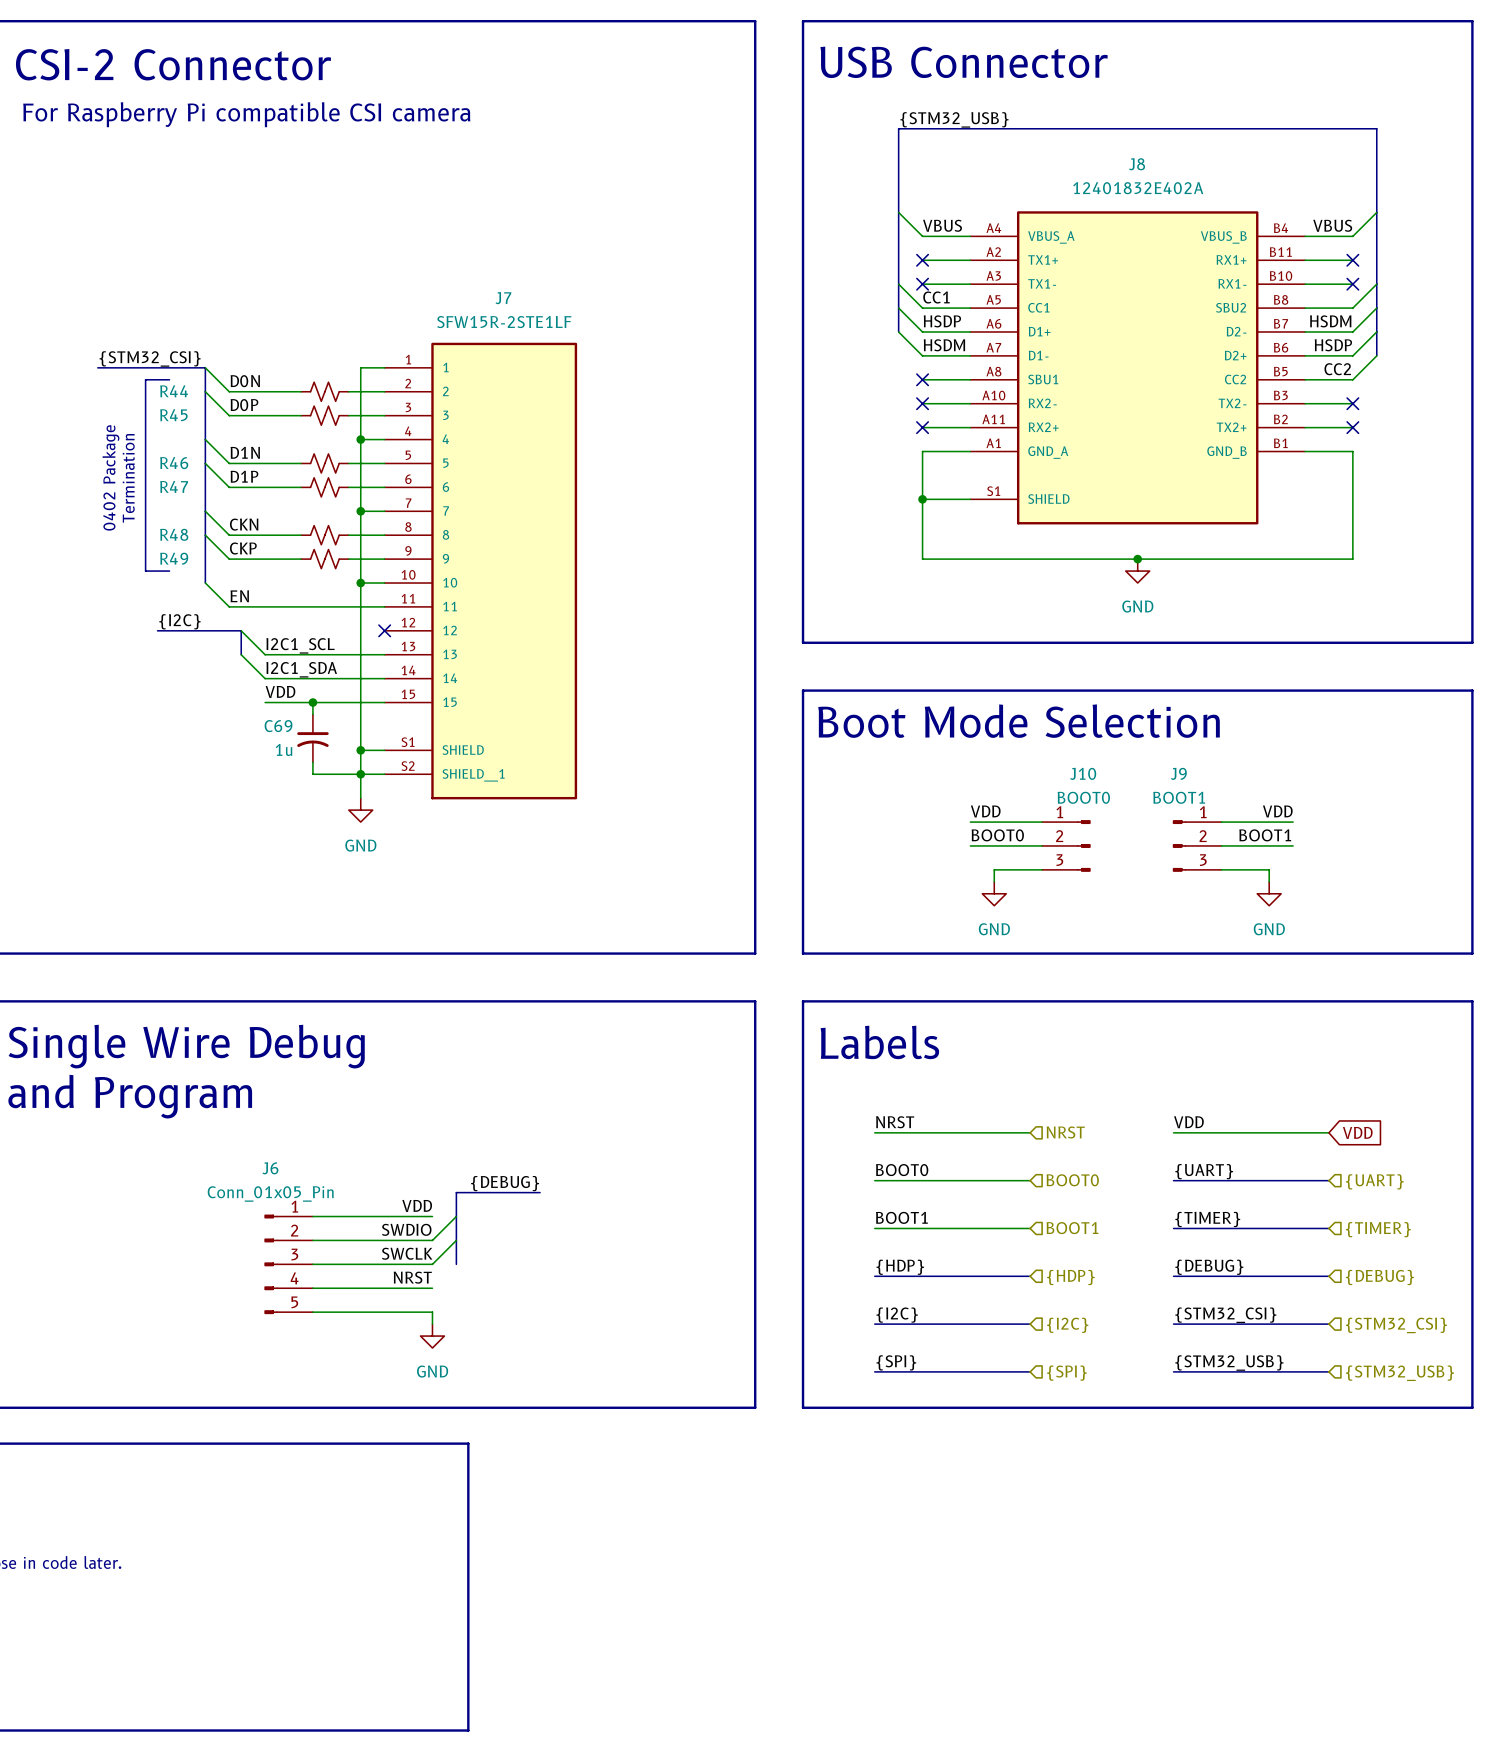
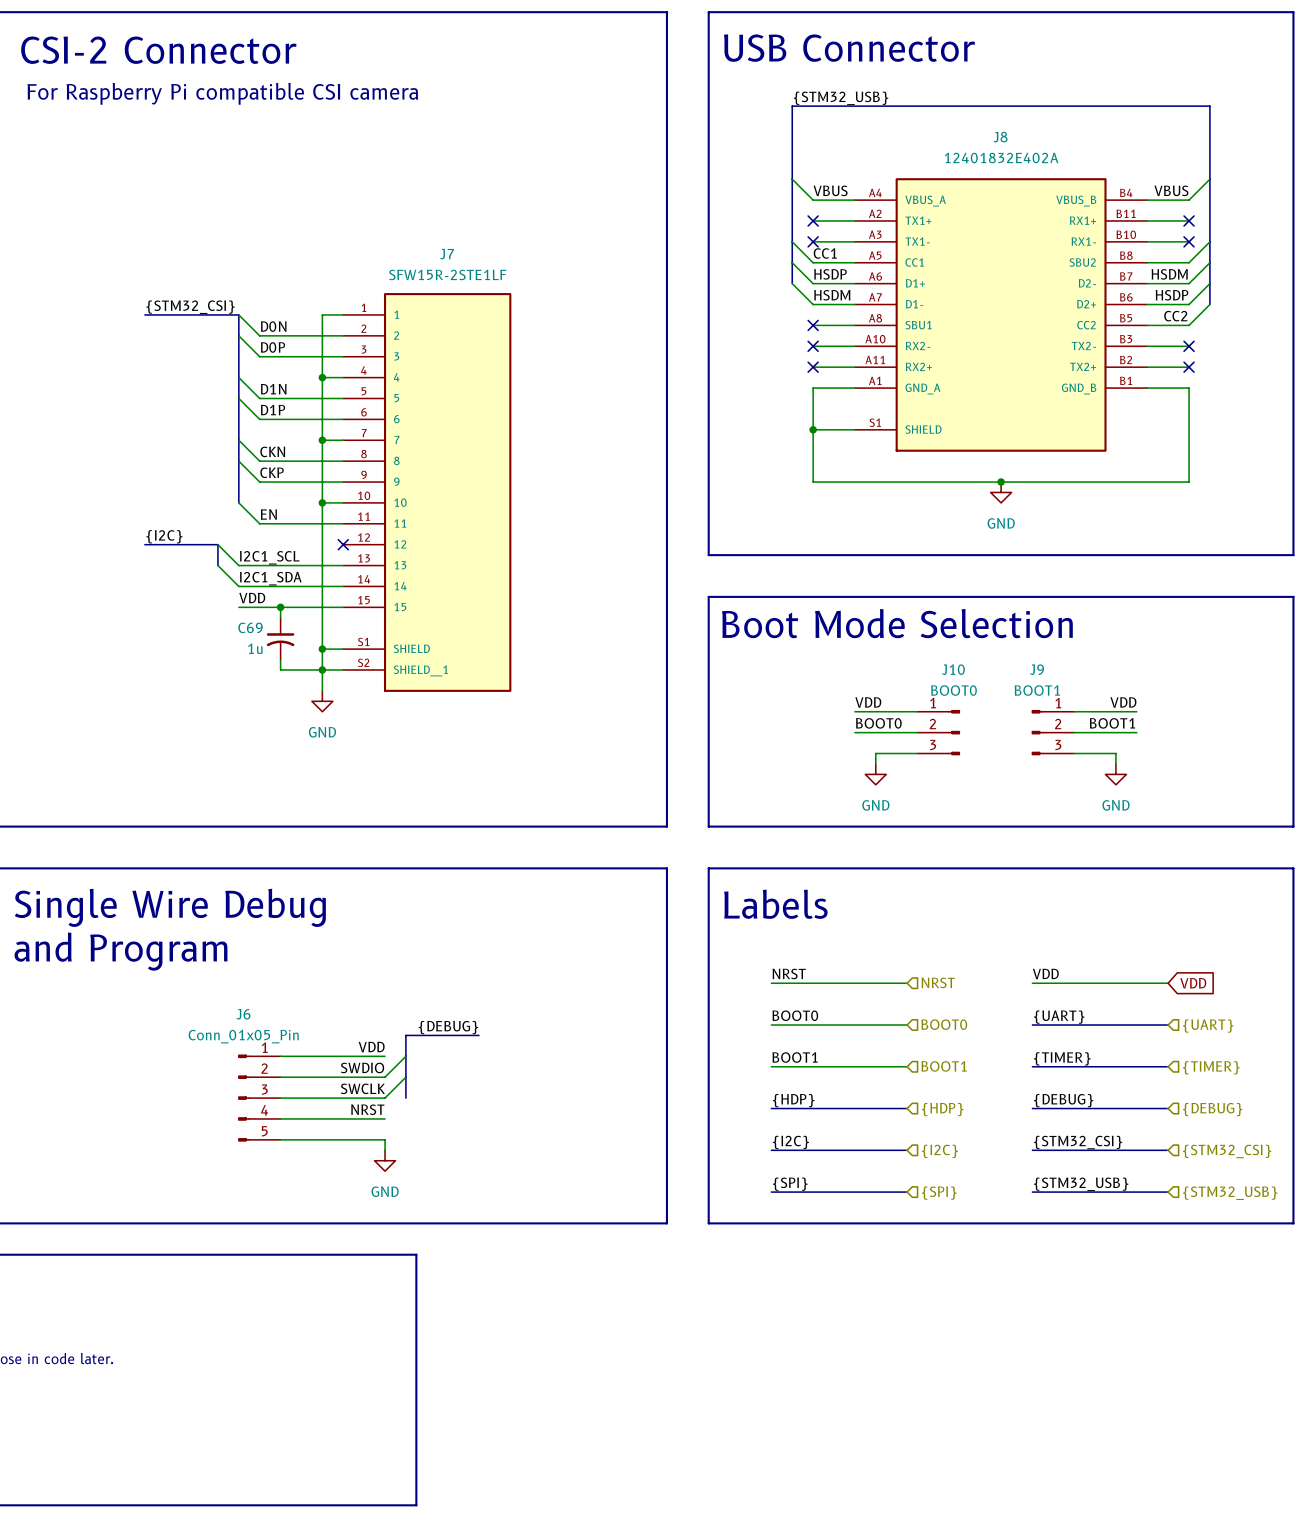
label position: {STM32_CSI} (150, 358) -> {STM32_CSI} (190, 307)
bus: (97, 367) (157, 367) -> none
wire: (205, 367) (229, 391) (289, 391) -> (238, 314) (259, 335)
bus: (205, 367) (205, 583) -> (186, 314) (238, 314) (238, 502)
line: (169, 379) (145, 379) (145, 571) (169, 571) -> none
label position: D0N (245, 381) -> D0N (273, 326)
wire: (205, 391) (229, 415) (289, 415) -> (238, 335) (259, 356)
R44: (324, 391) -> none
label position: D0P (244, 405) -> D0P (272, 347)
R45: (324, 415) -> none
wire: (205, 439) (229, 463) (289, 463) -> (238, 377) (259, 398)
label position: D1N (245, 452) -> D1N (273, 389)
wire: (205, 463) (229, 487) (289, 487) -> (238, 398) (259, 419)
R46: (324, 463) -> none
label position: D1P (244, 476) -> D1P (272, 410)
text: 0402 Package (110, 477) -> none
text: Termination (128, 478) -> none
R47: (324, 487) -> none
wire: (205, 511) (229, 535) (289, 535) -> (238, 440) (259, 461)
label position: CKN (244, 524) -> CKN (272, 451)
wire: (205, 535) (229, 559) (289, 559) -> (238, 461) (259, 482)
R48: (324, 535) -> none
label position: CKP (243, 548) -> CKP (272, 472)
R49: (324, 559) -> none
wire: (205, 583) (229, 606) (289, 606) -> (238, 502) (259, 523)
label position: EN (239, 596) -> EN (268, 514)

